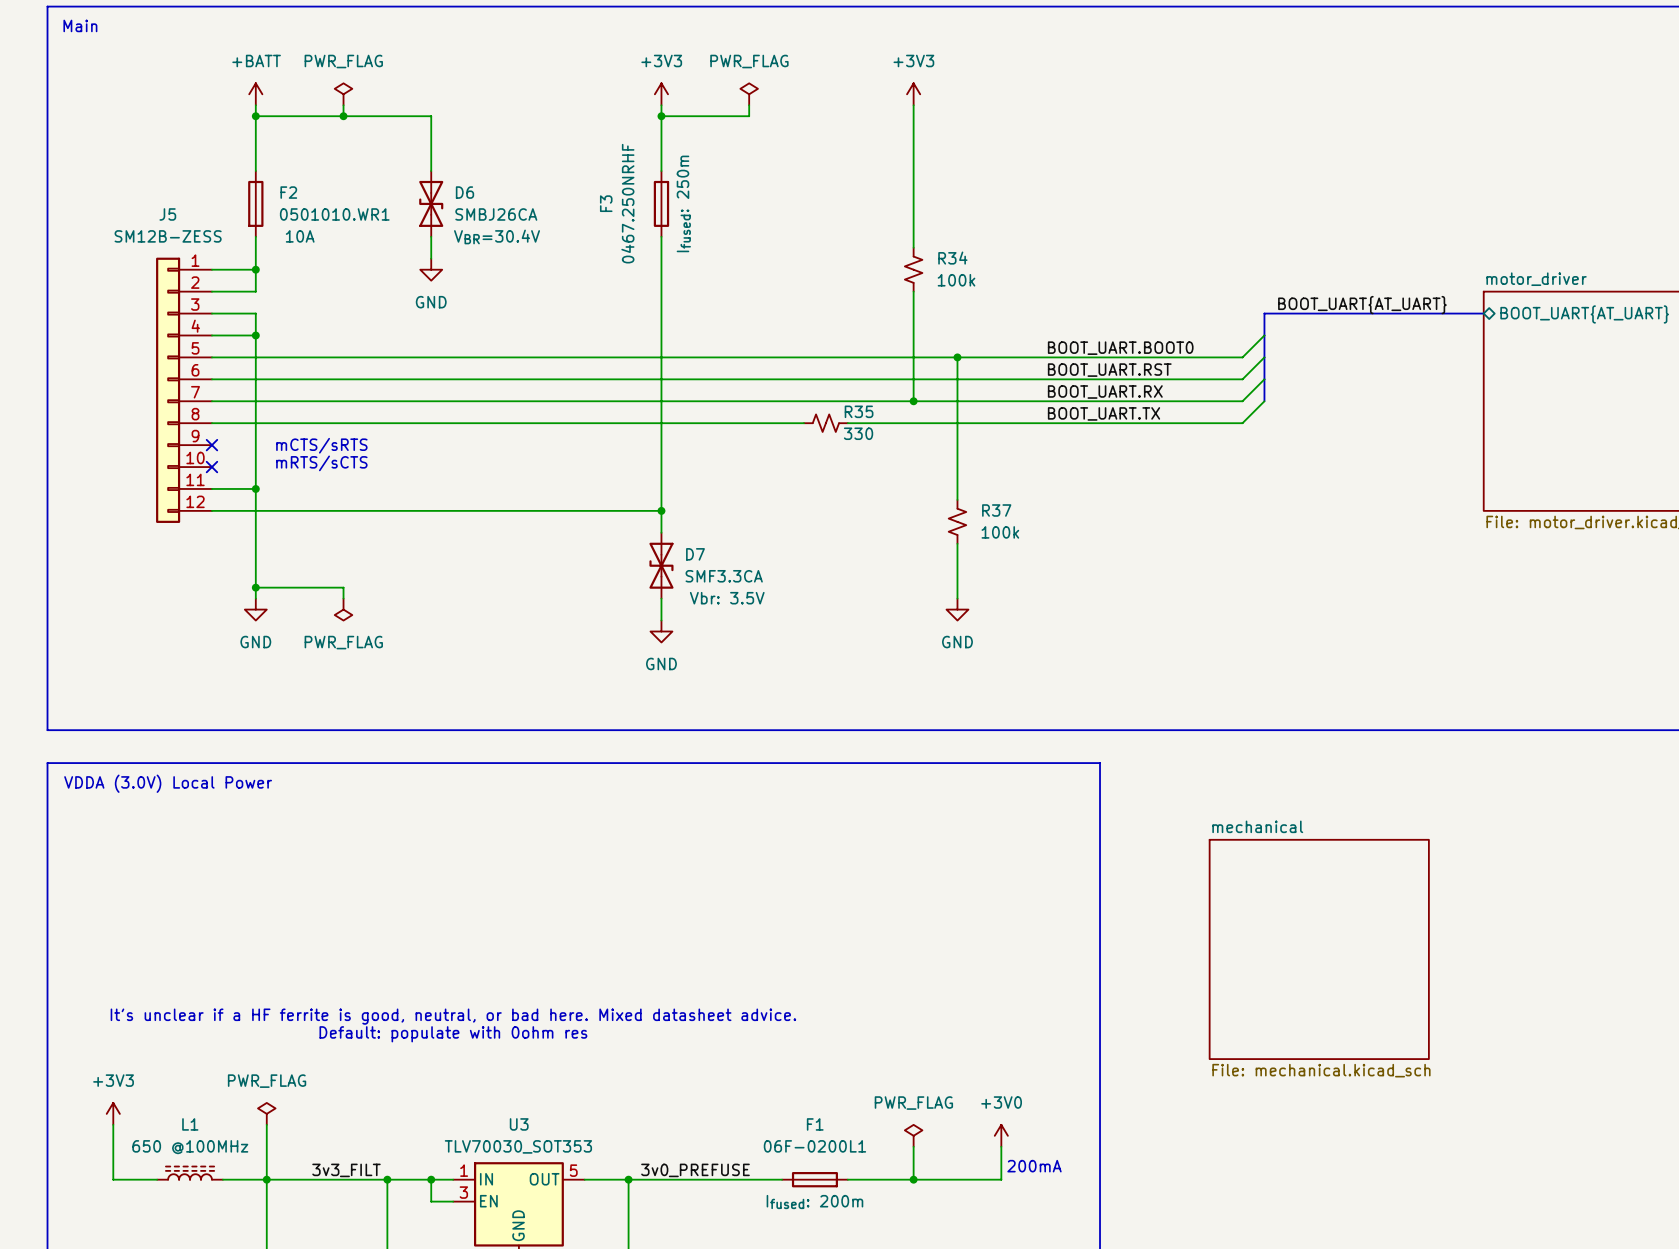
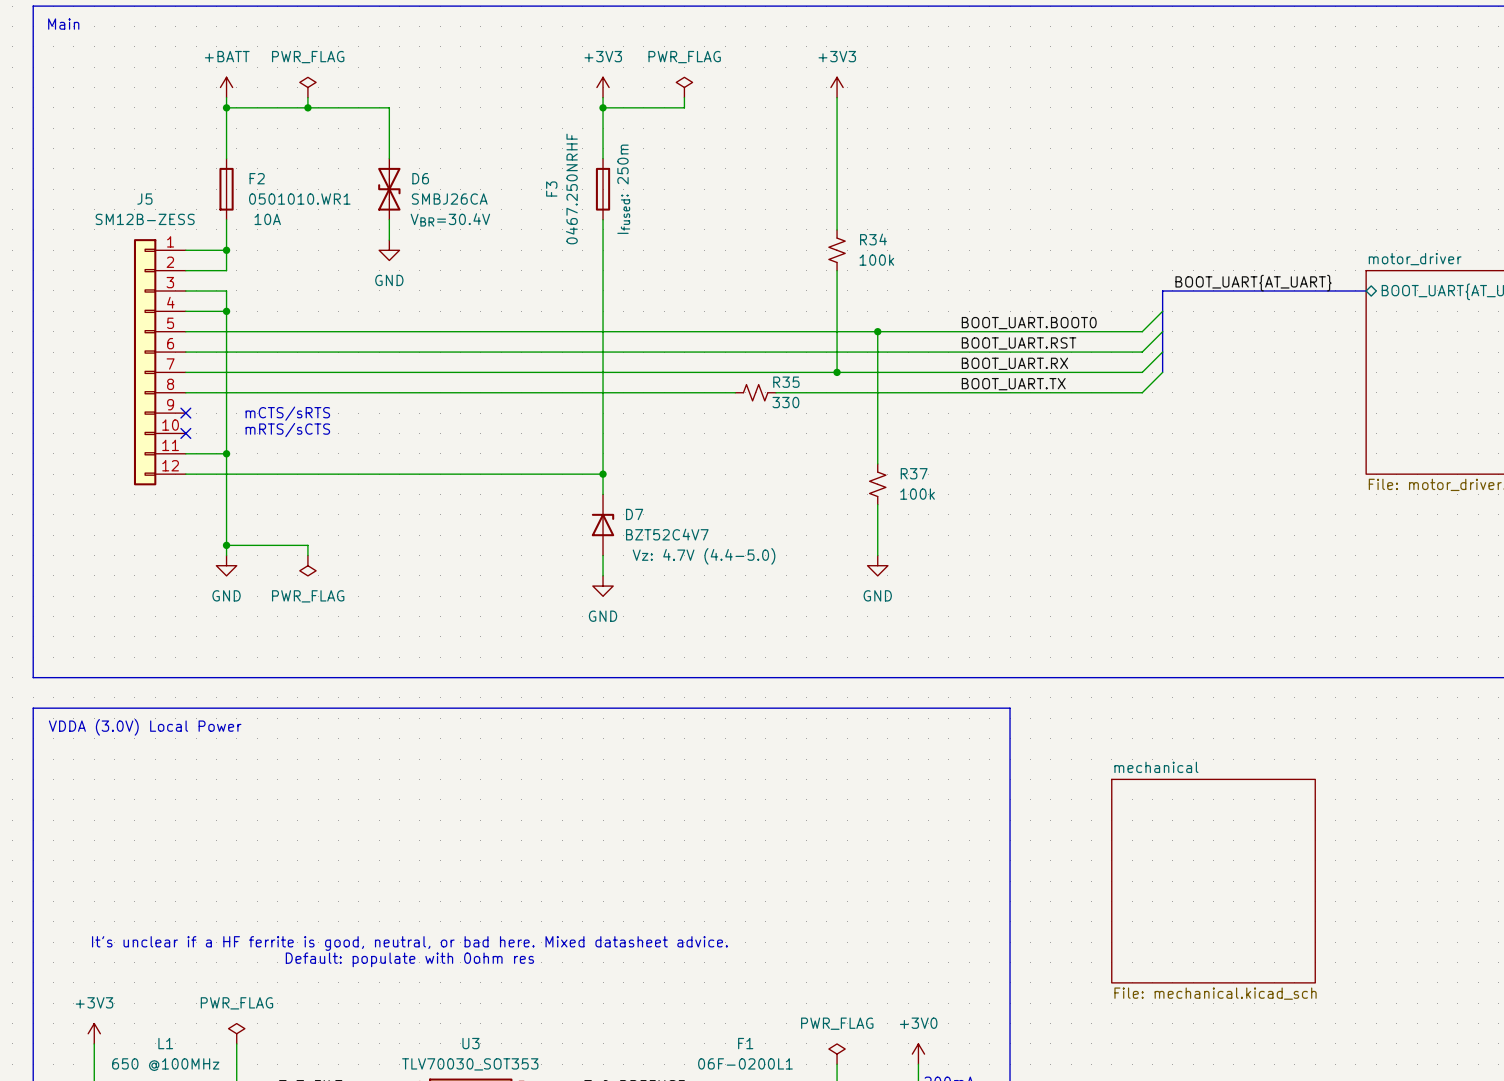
D7 symbol: [649, 532, 674, 599] -> [591, 494, 615, 556]
D7 value: SMF3.3CA (724, 576) -> BZT52C4V7 (667, 534)
D7 text: Vbr: 3.5V (727, 598) -> none
D7 text: none -> Vz: 4.7V (4.4-5.0) (704, 556)

